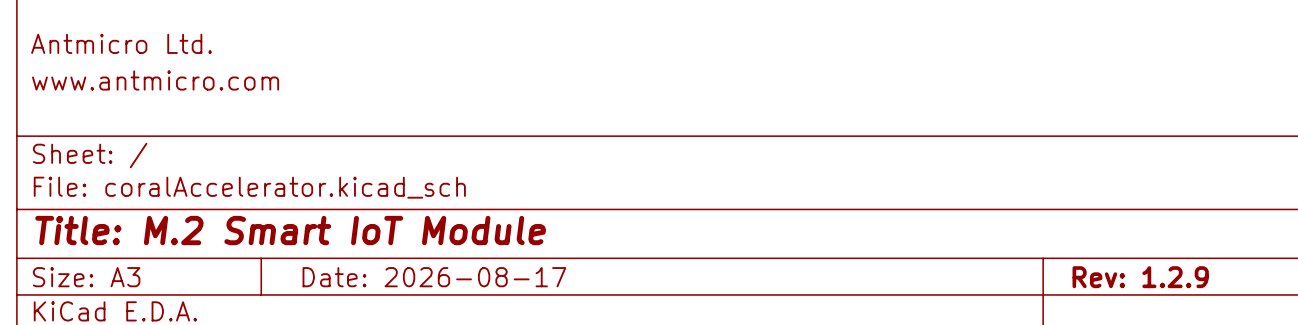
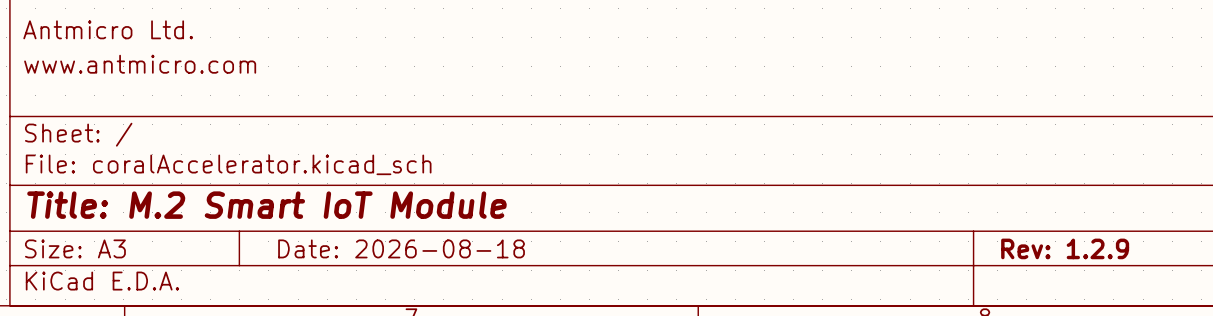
title block: Date: 2026-08-17 (434, 277) -> Date: 2026-08-18 (401, 248)

